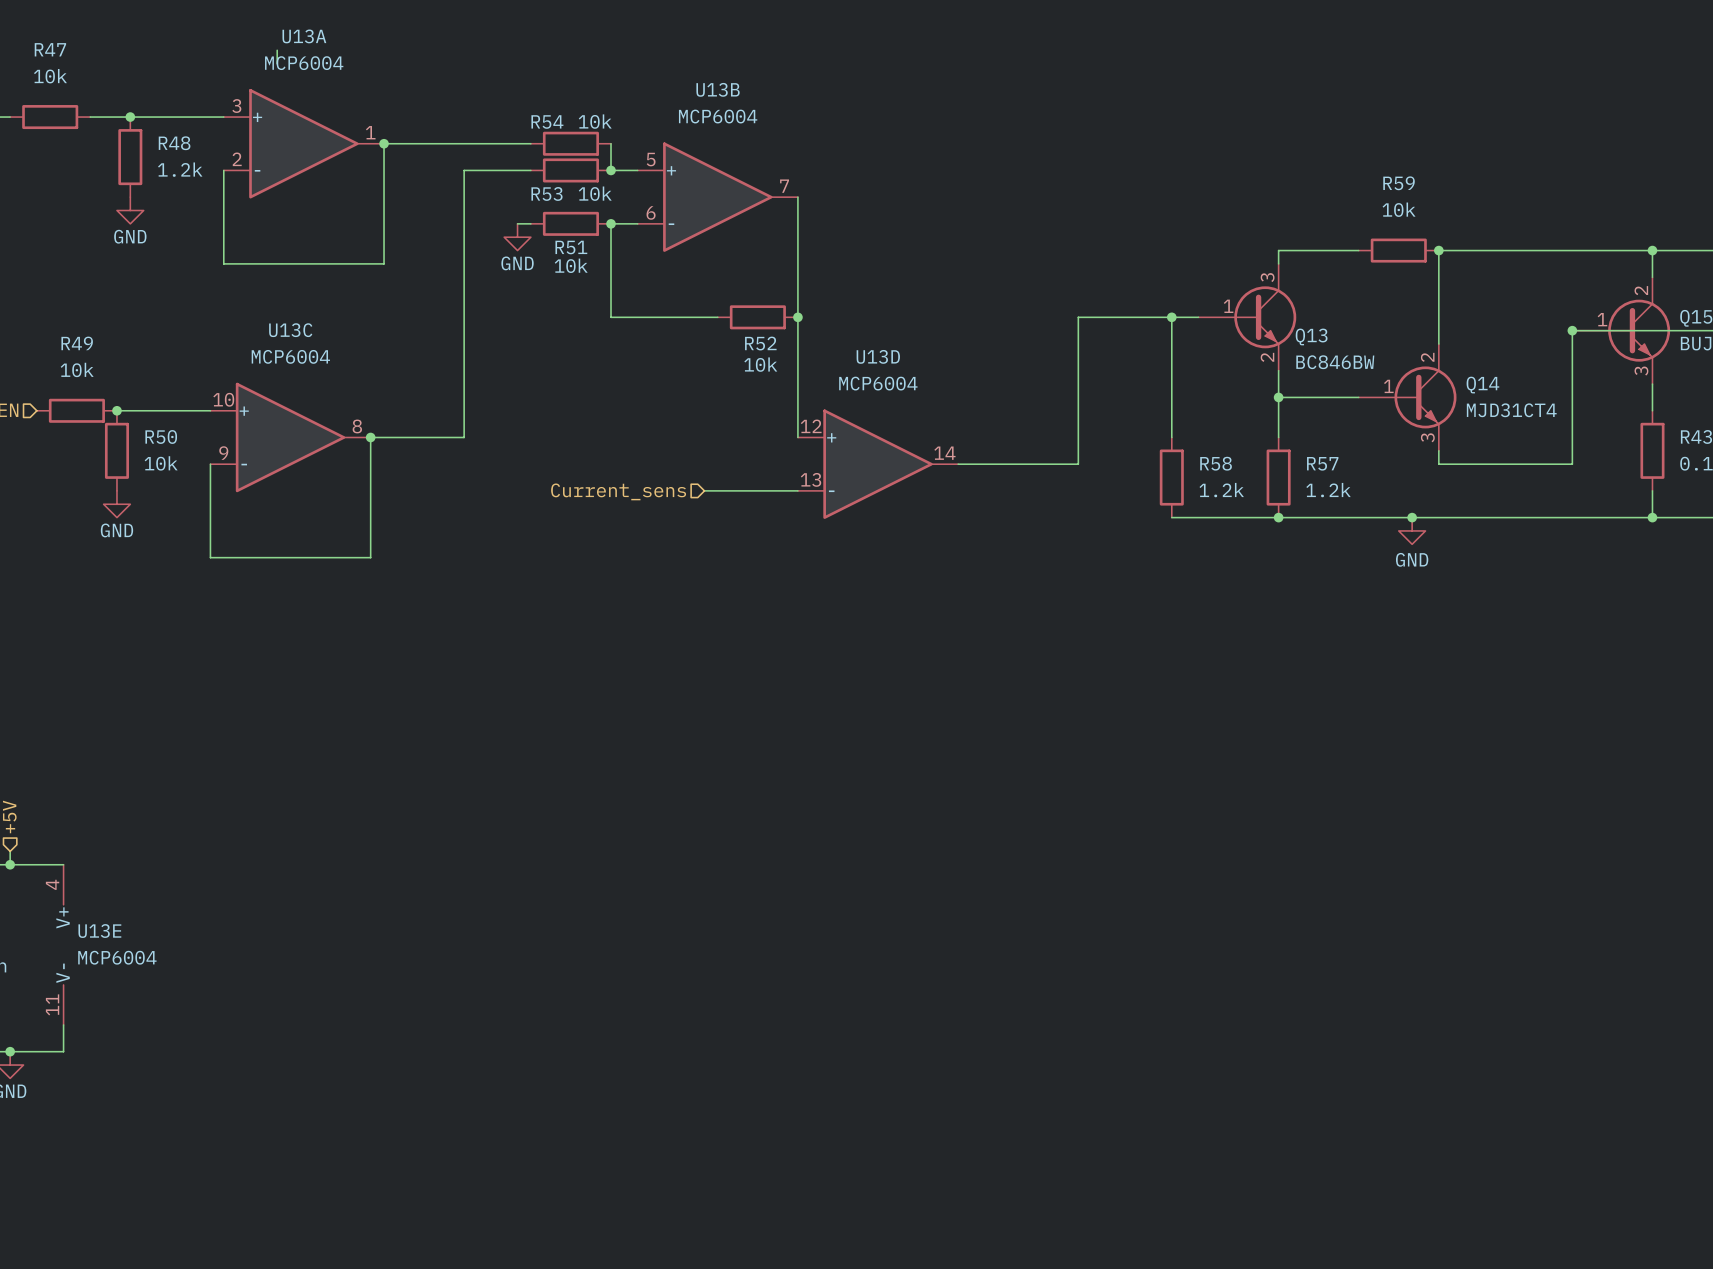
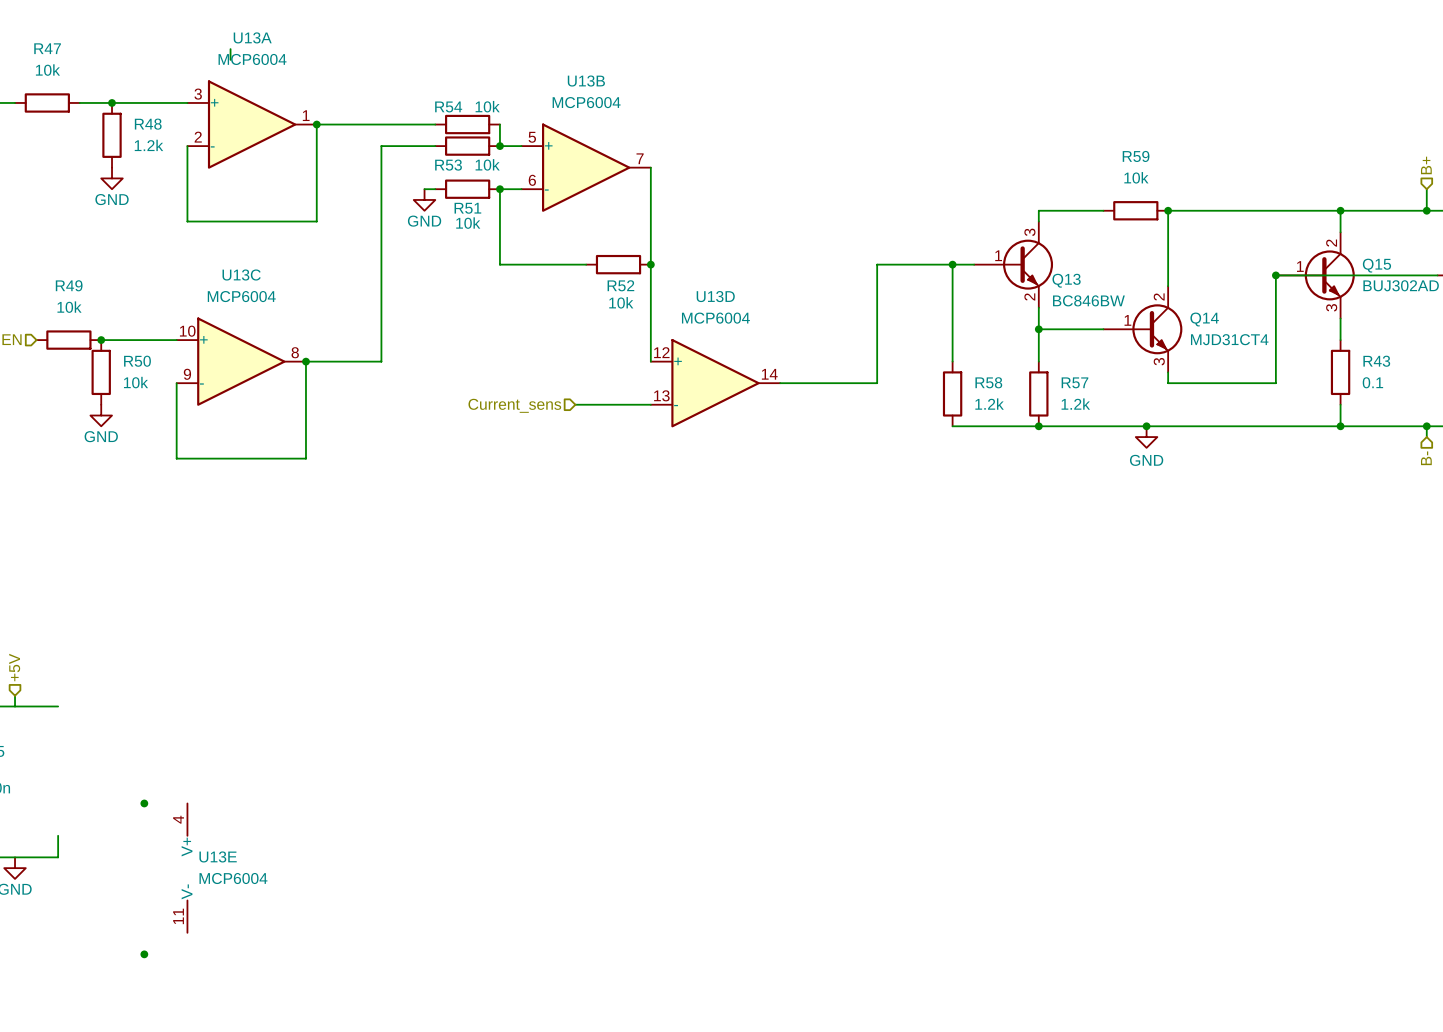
junction: (10, 864) -> none
U13E position: (63, 944) -> (187, 868)
junction: none -> (144, 803)
junction: (10, 1051) -> none
junction: none -> (144, 954)

